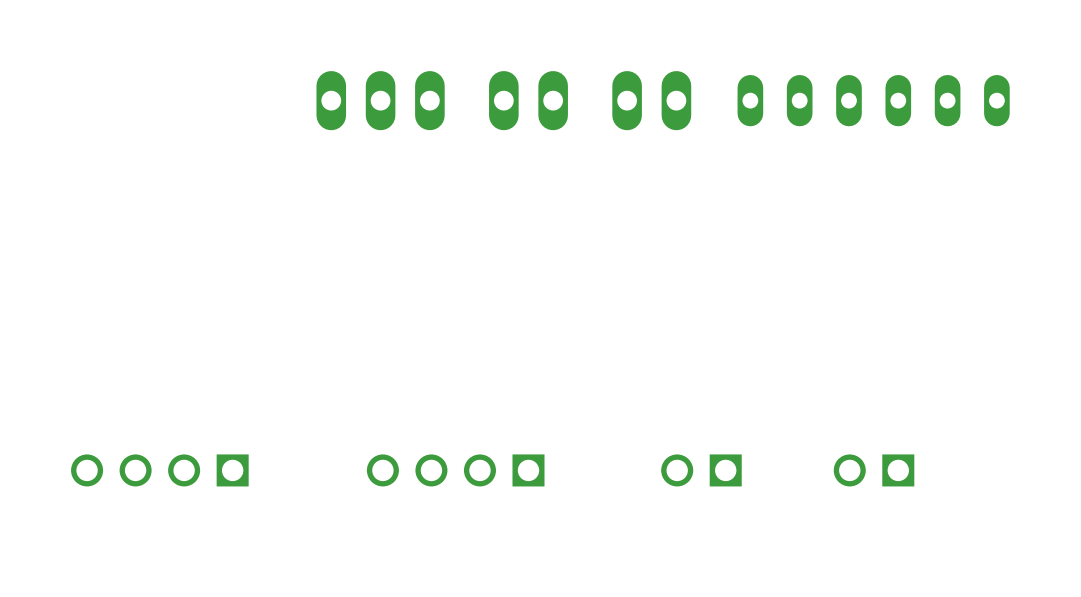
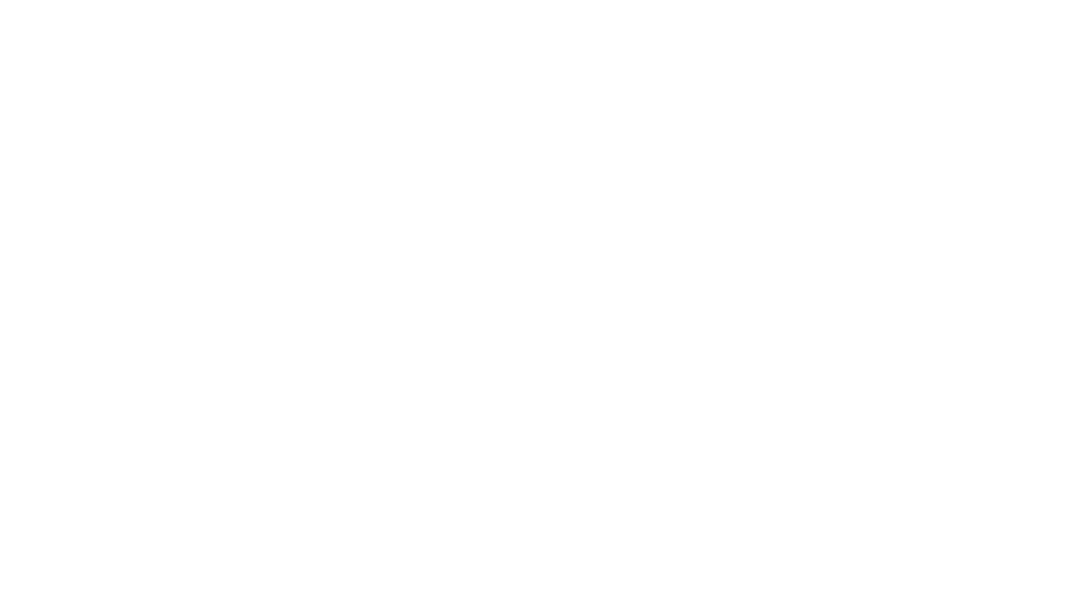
part: (380, 100) -> none
part: (528, 100) -> none
part: (651, 100) -> none
part: (873, 100) -> none
part: (159, 470) -> none
part: (455, 470) -> none
part: (701, 470) -> none
part: (874, 470) -> none

